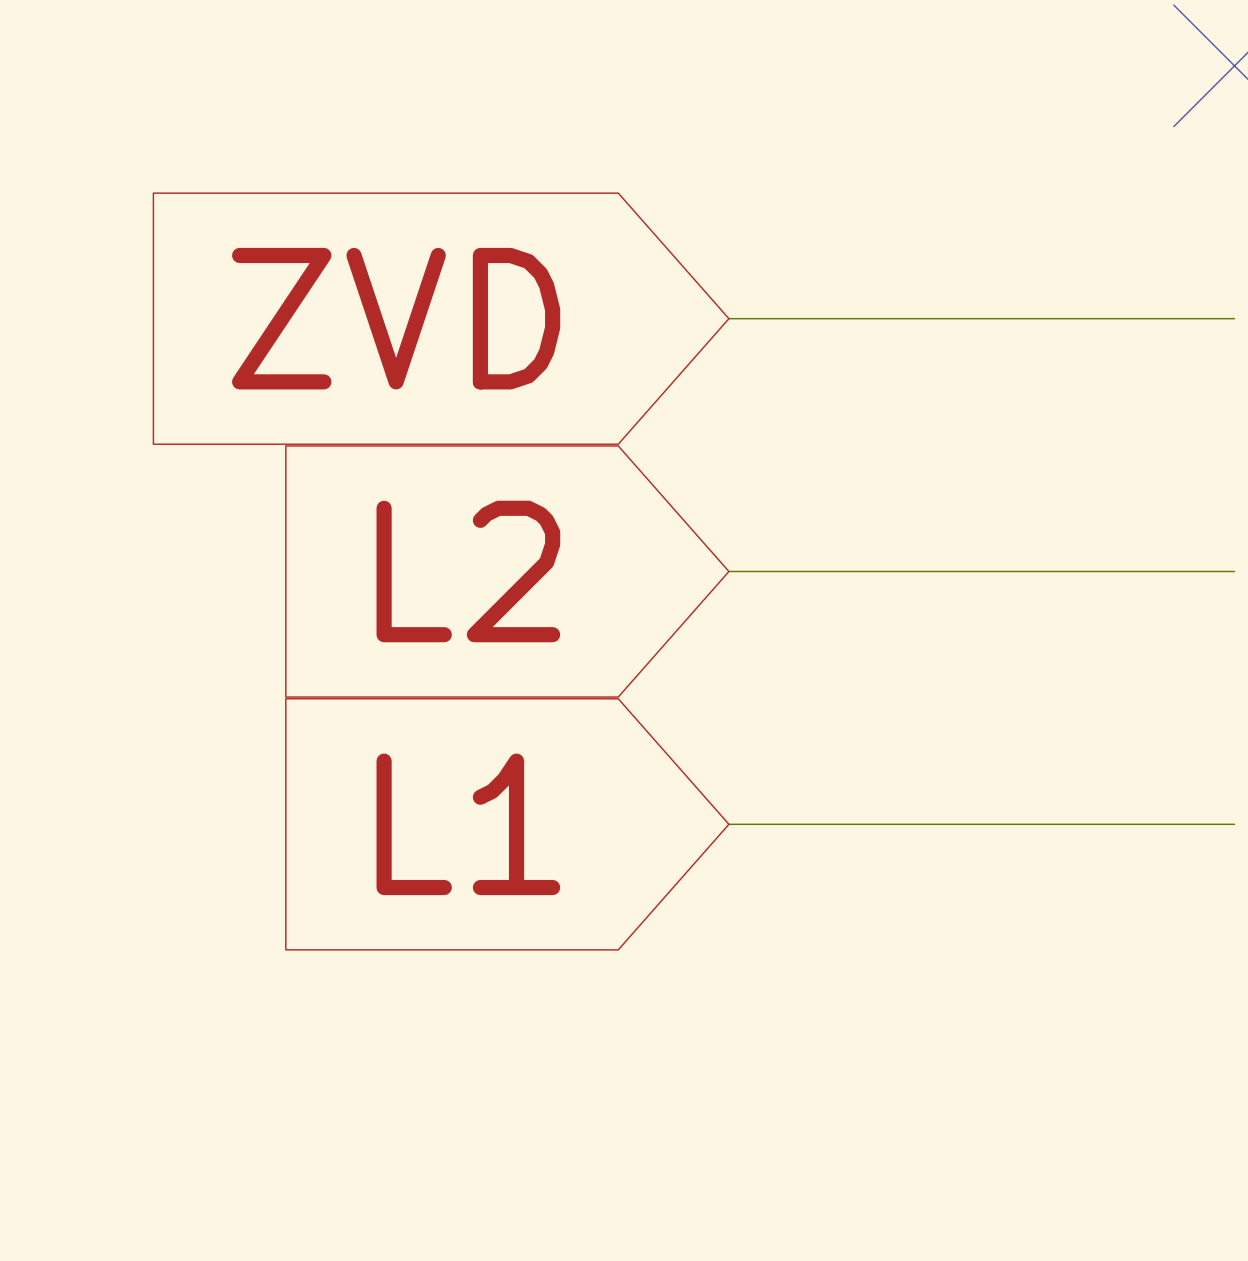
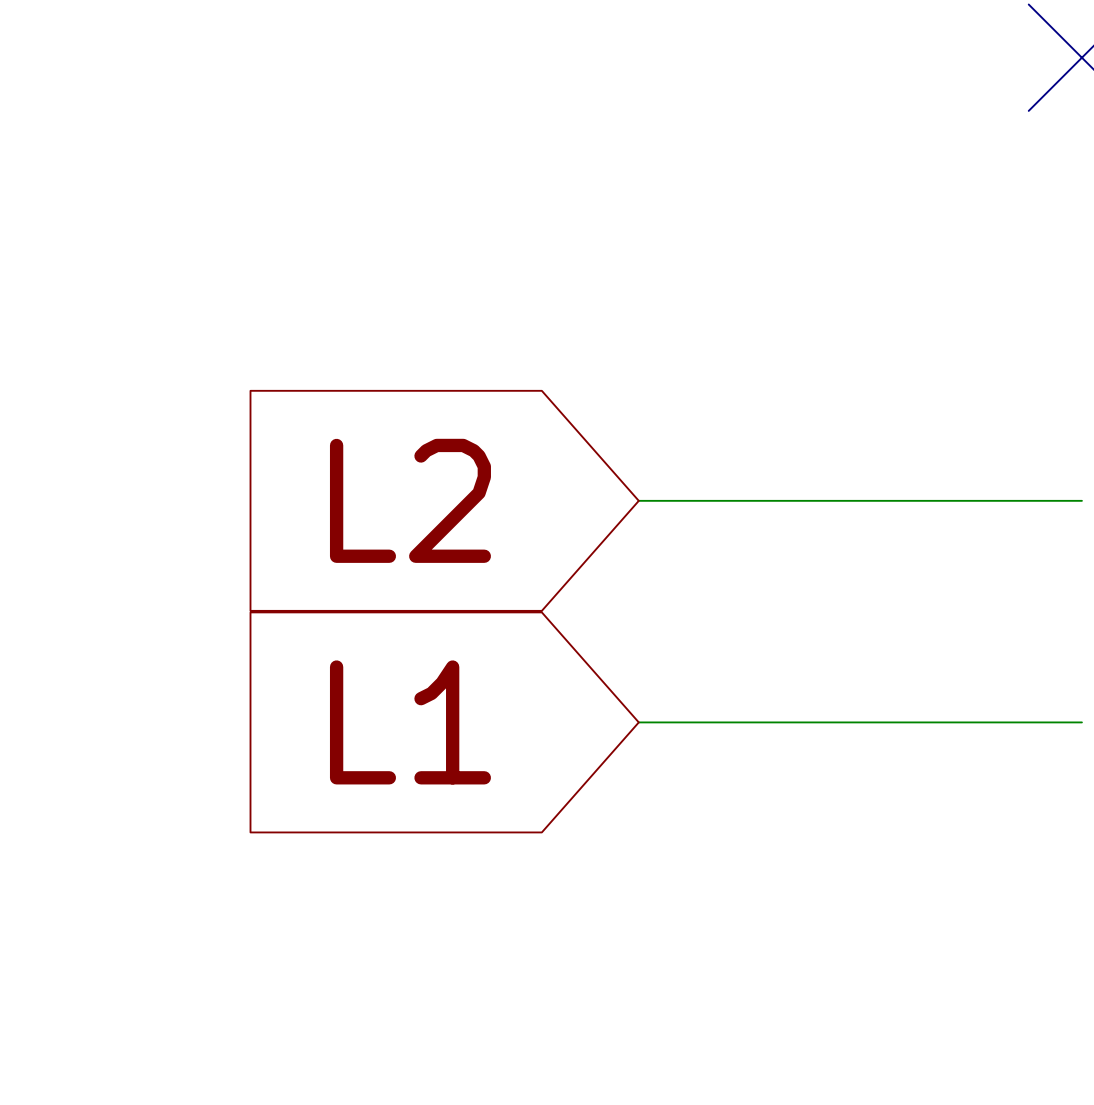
global label: ZVD (396, 318) -> none
wire: (728, 318) (1234, 318) -> none

